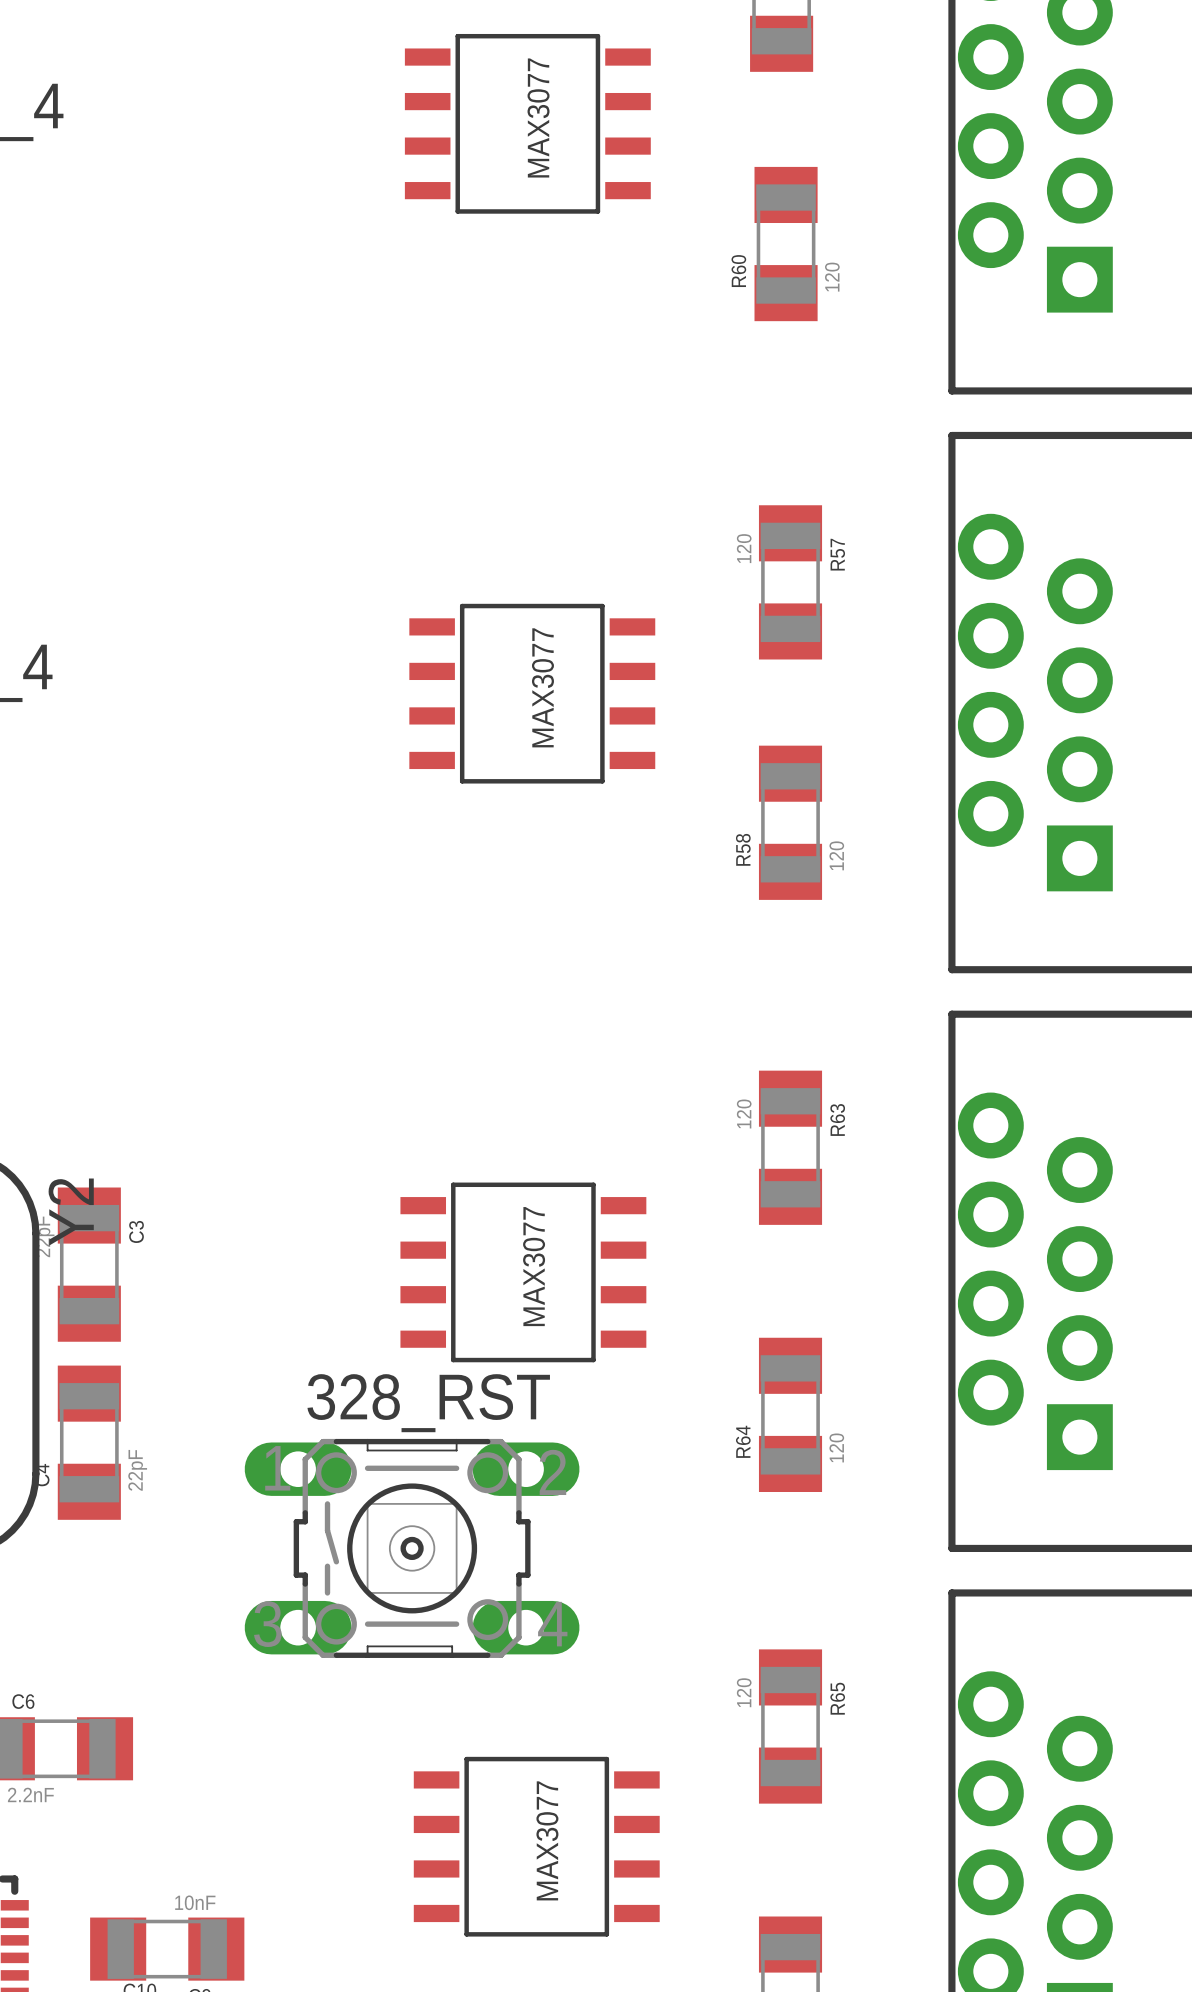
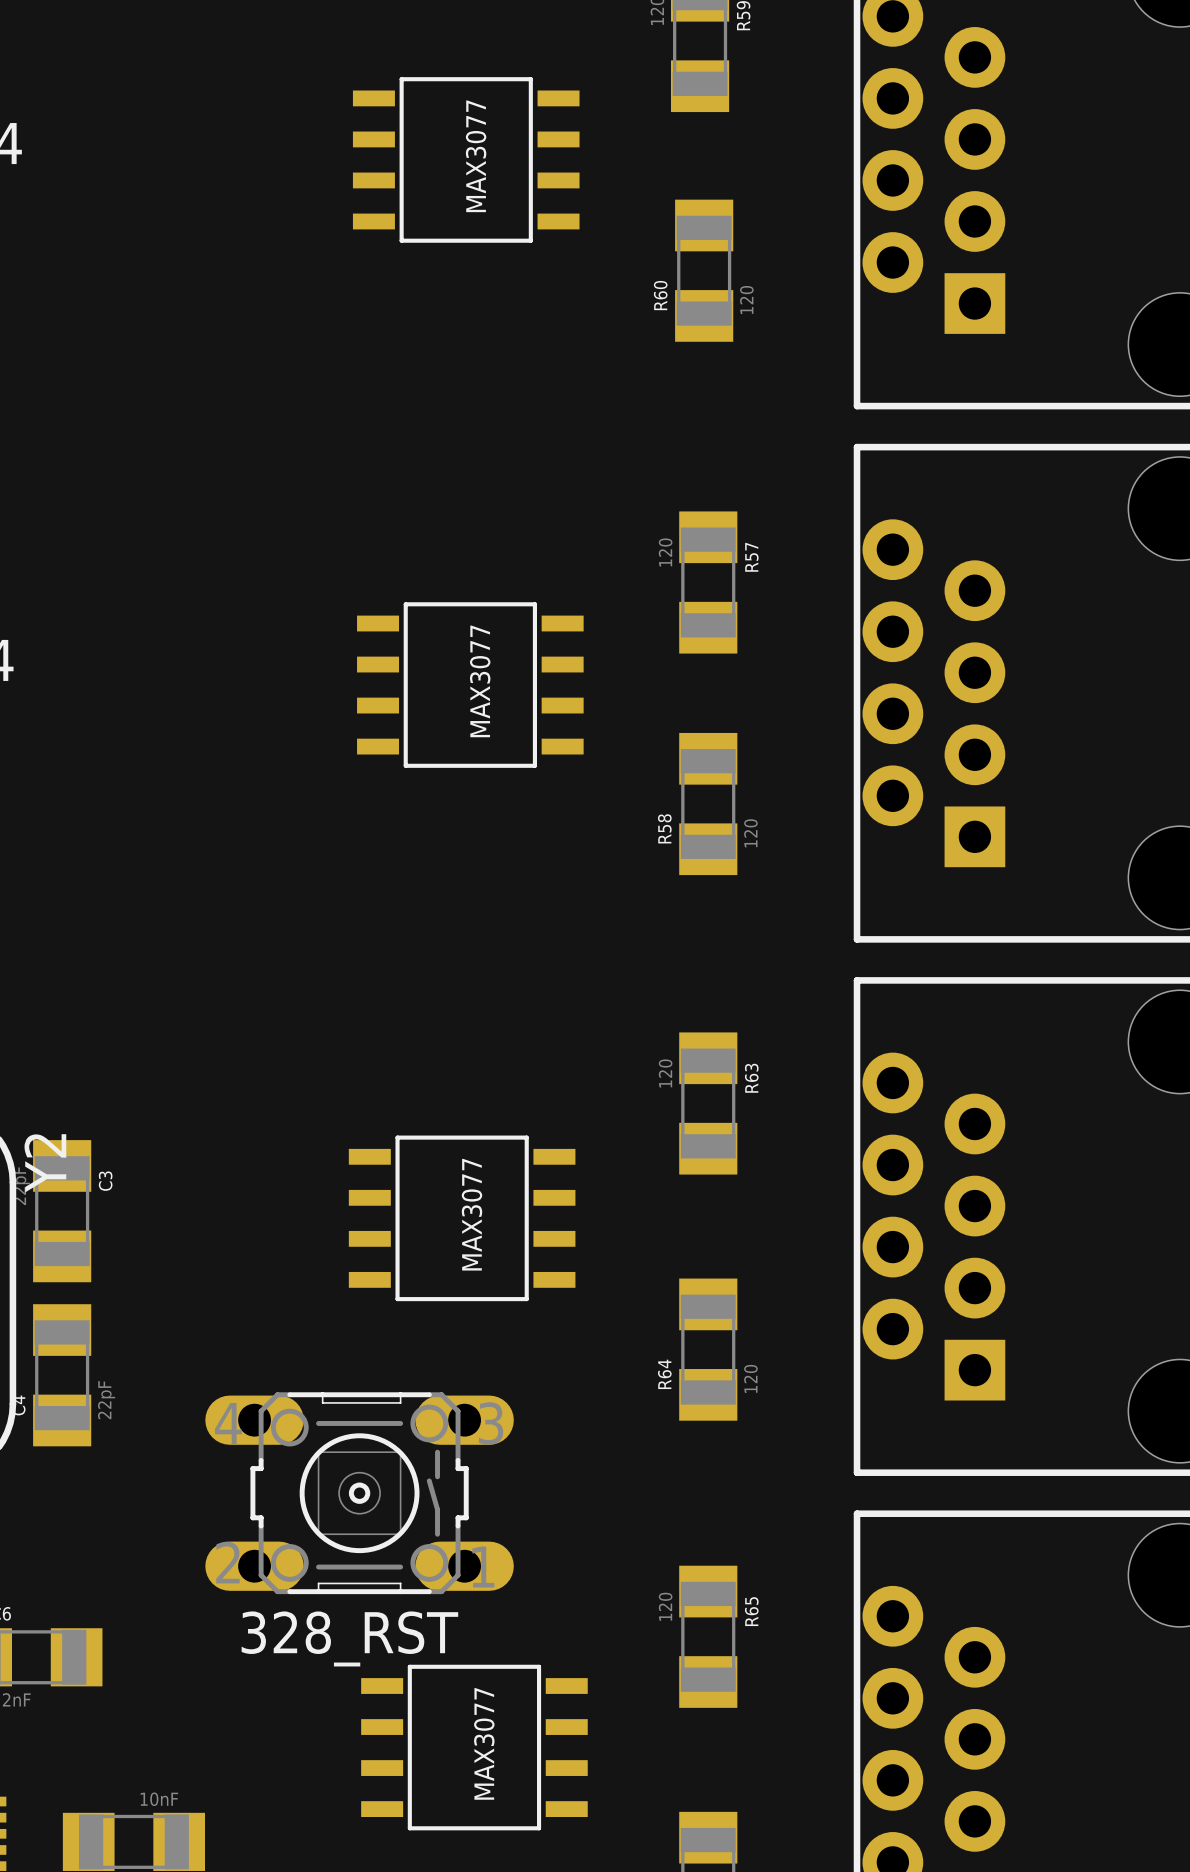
328_RST name position: 328_RST (428, 1403) -> 328_RST (349, 1638)
328_RST footprint: [244, 1438, 580, 1658] -> [205, 1392, 514, 1595]

